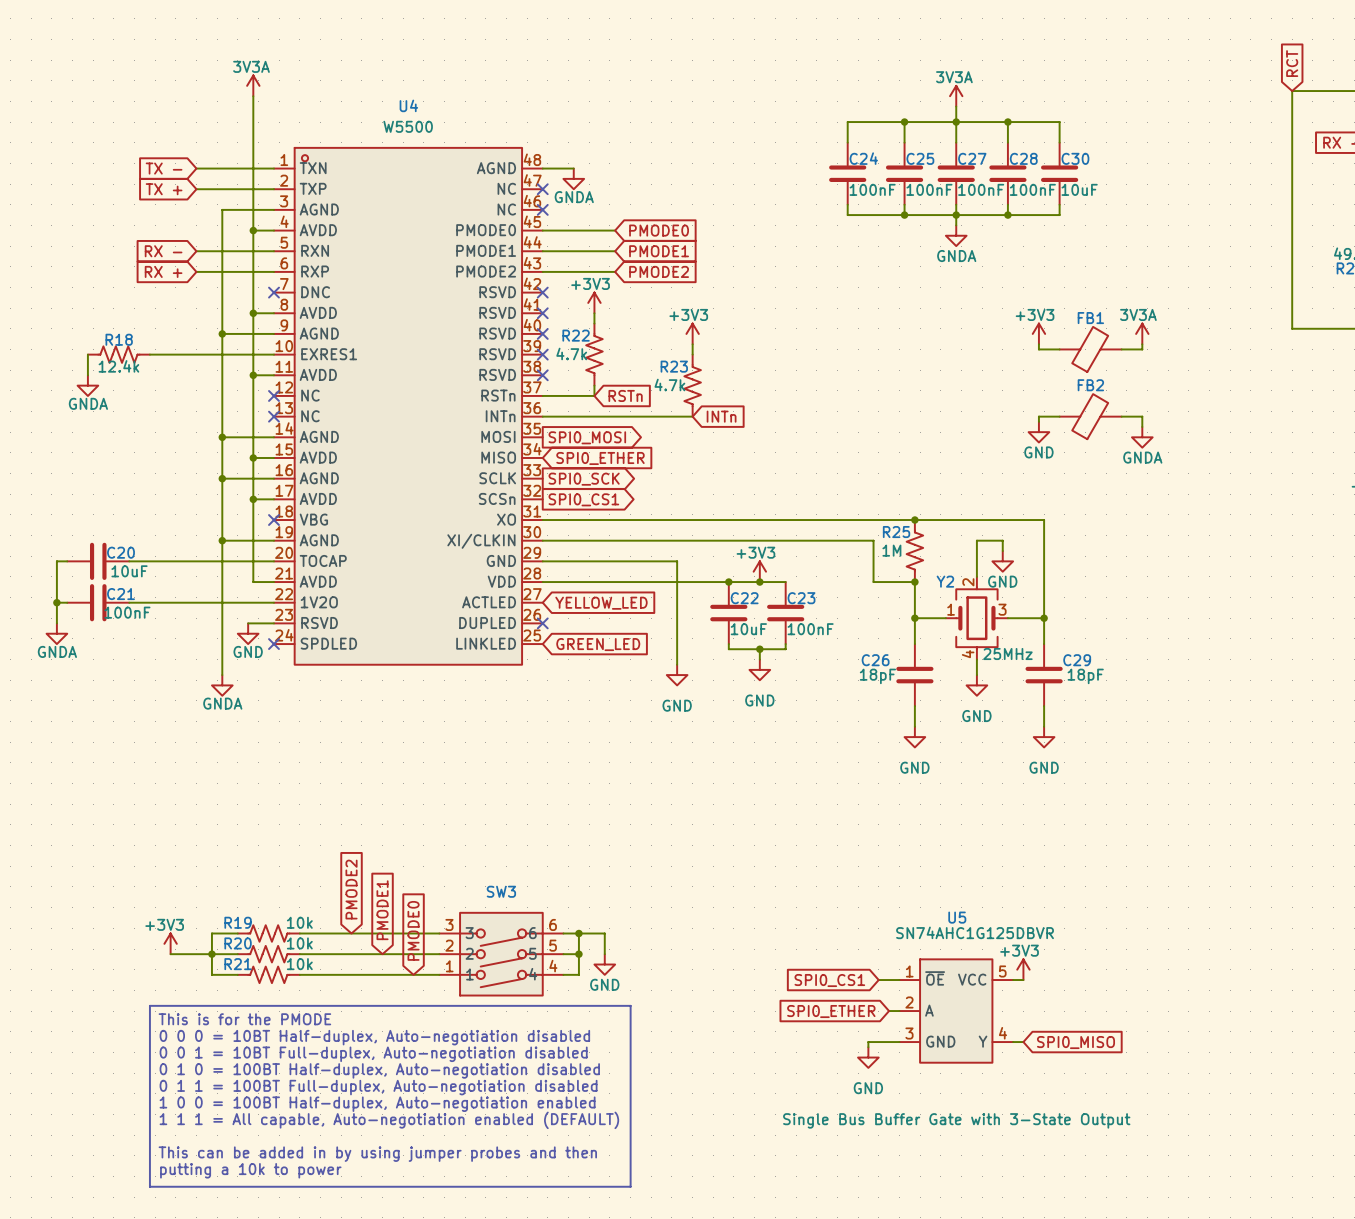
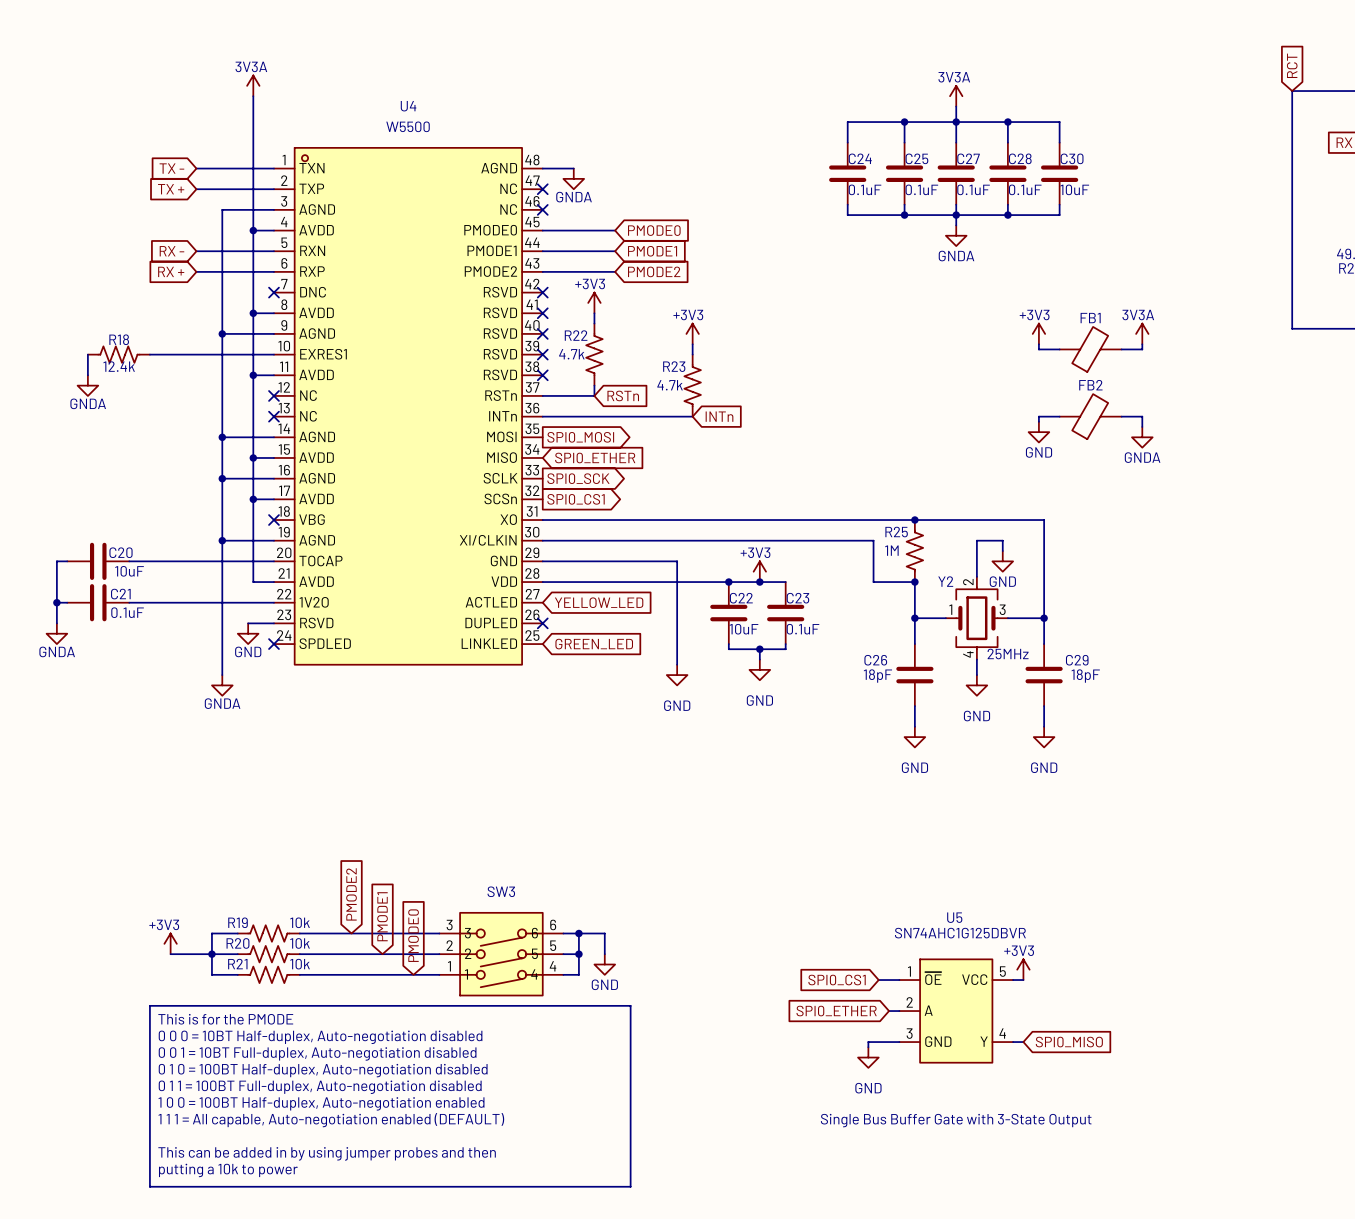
C24 value: 100nF (872, 189) -> 0.1uF (865, 189)
C25 value: 100nF (929, 189) -> 0.1uF (921, 189)
C27 value: 100nF (981, 189) -> 0.1uF (973, 189)
C28 value: 100nF (1032, 189) -> 0.1uF (1025, 189)
C21 value: 100nF (127, 612) -> 0.1uF (127, 612)
C23 value: 100nF (810, 629) -> 0.1uF (803, 629)

